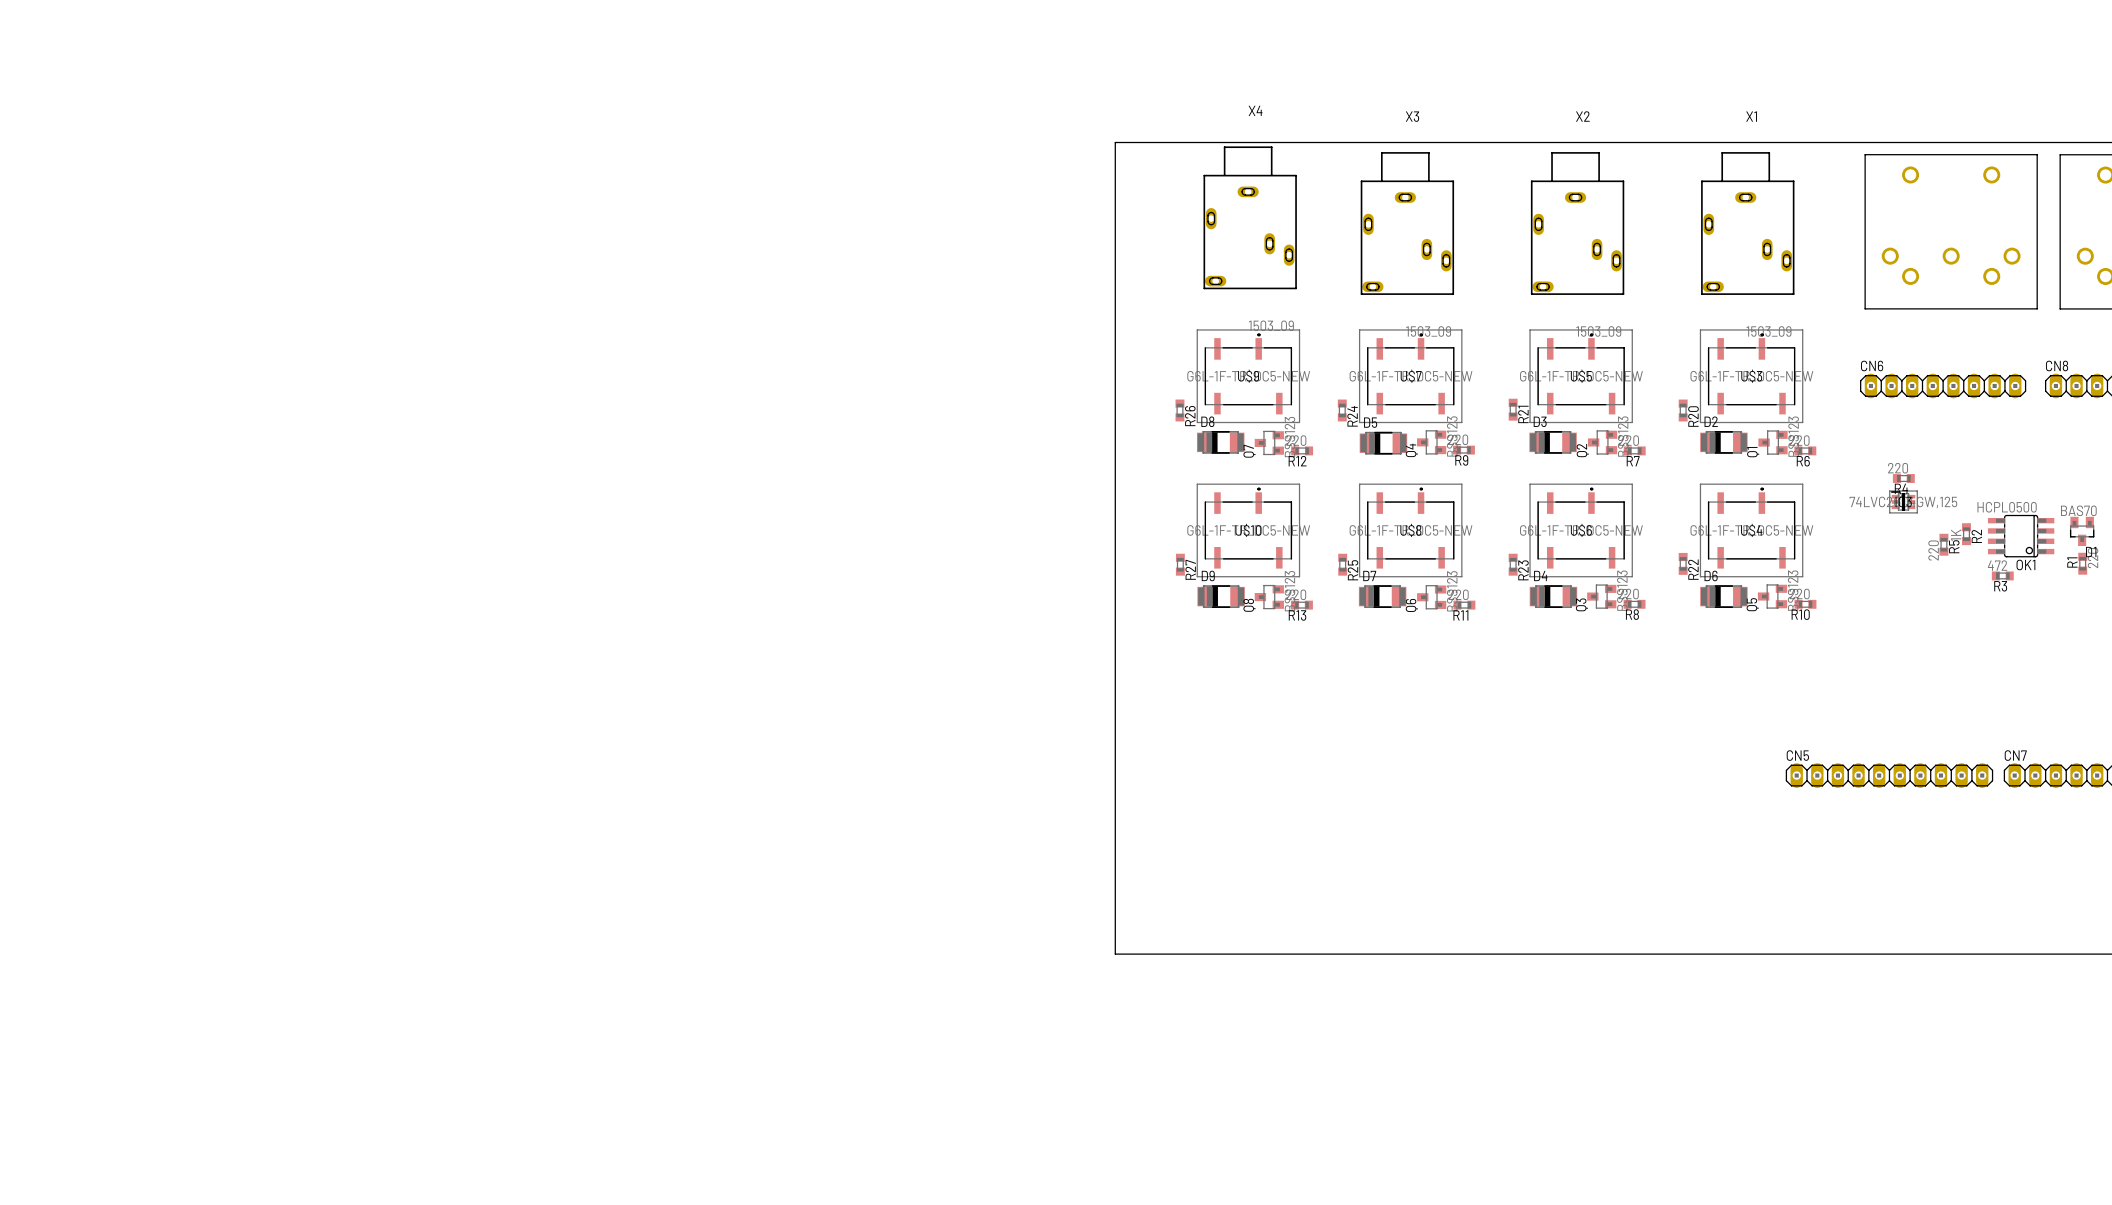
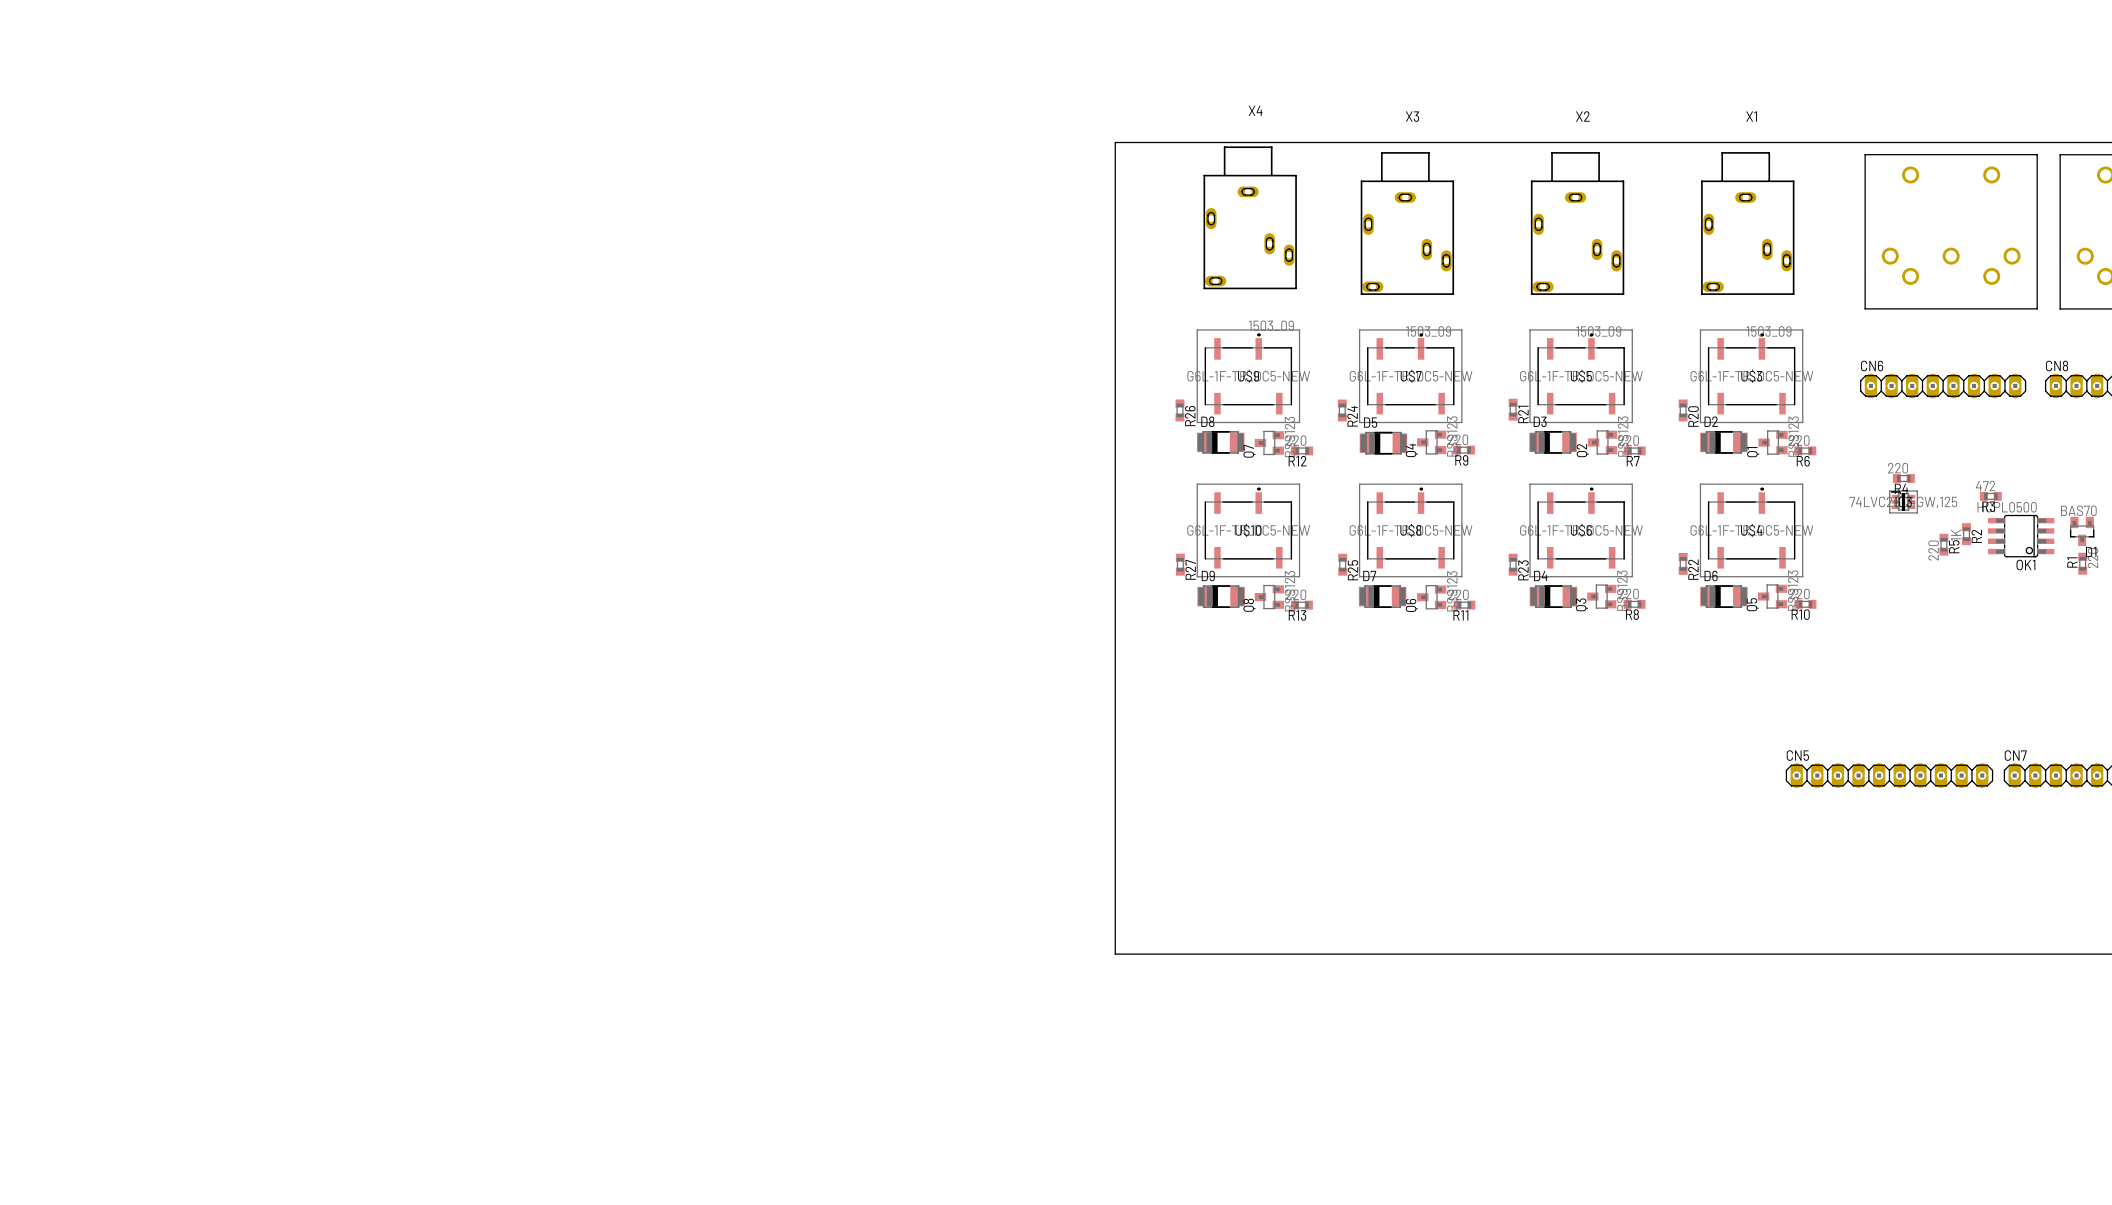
R3 position: (2002, 575) -> (1990, 496)

